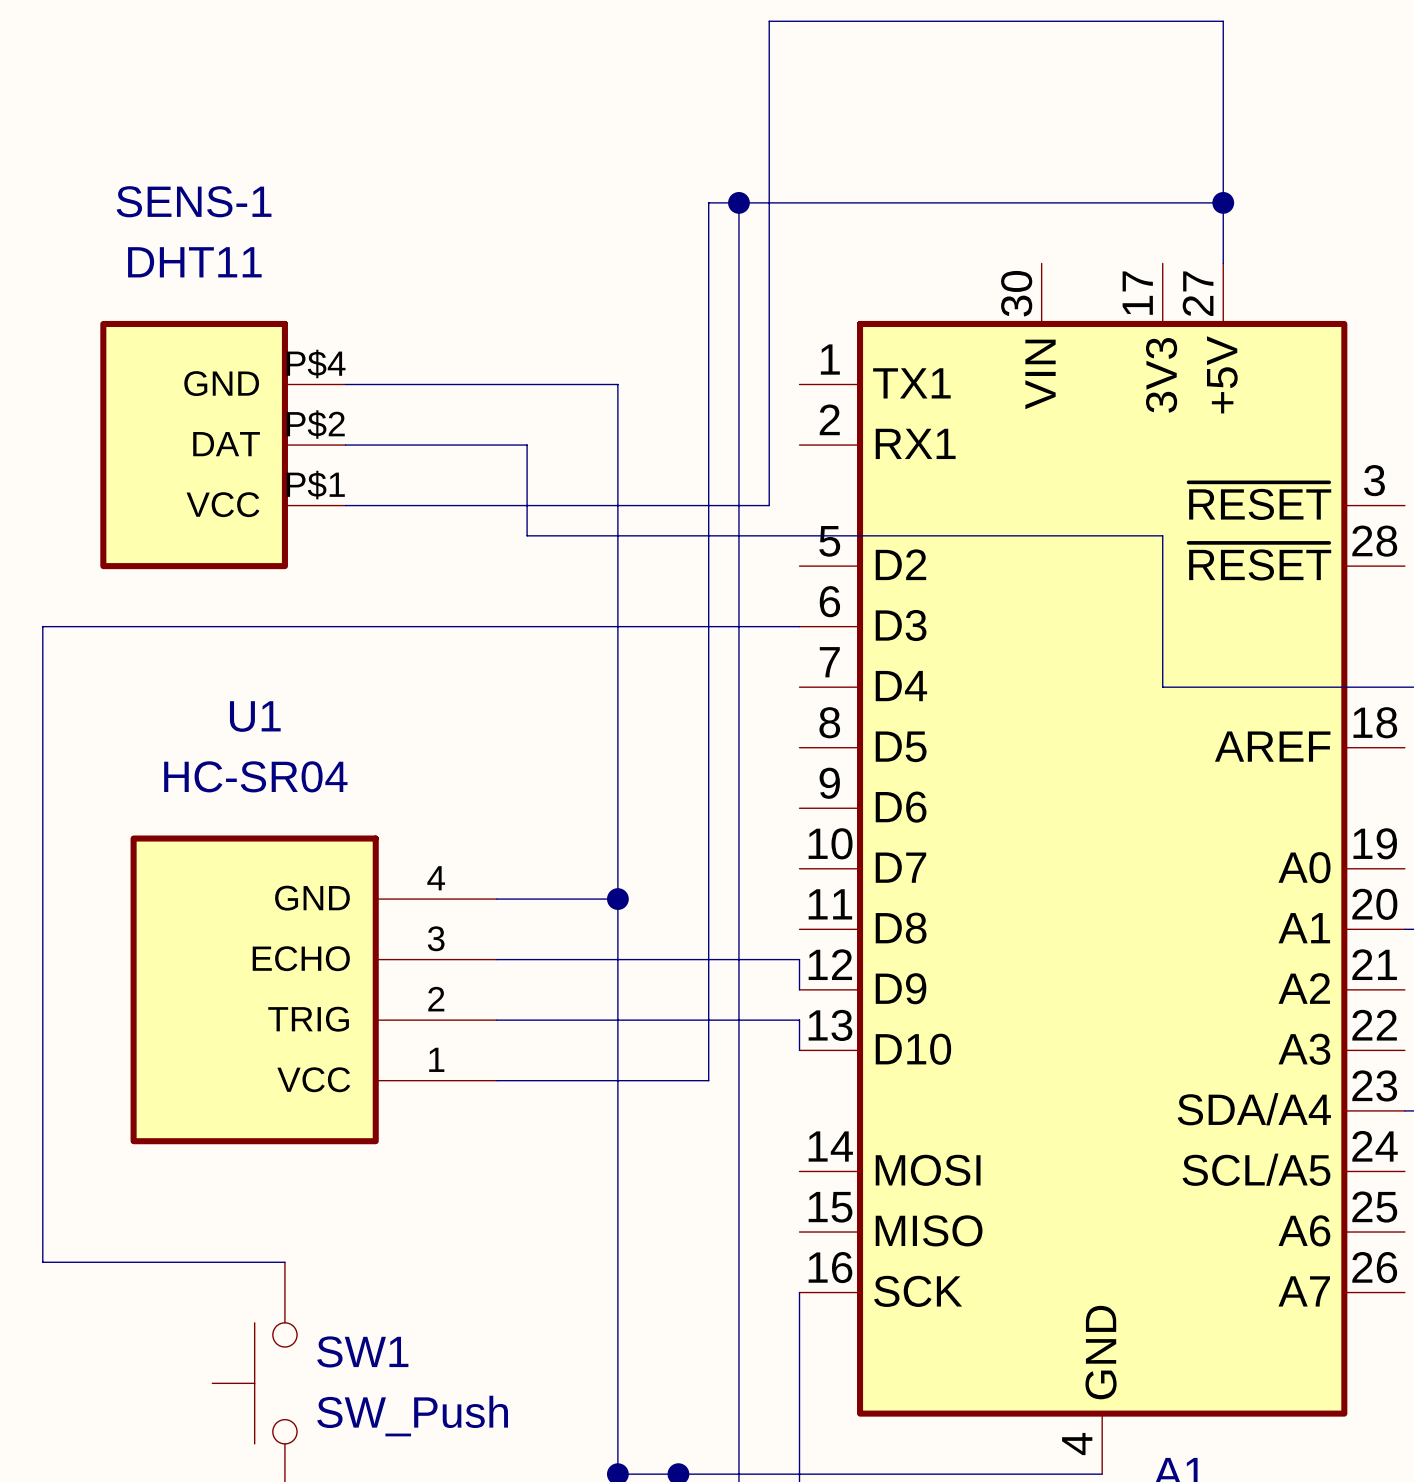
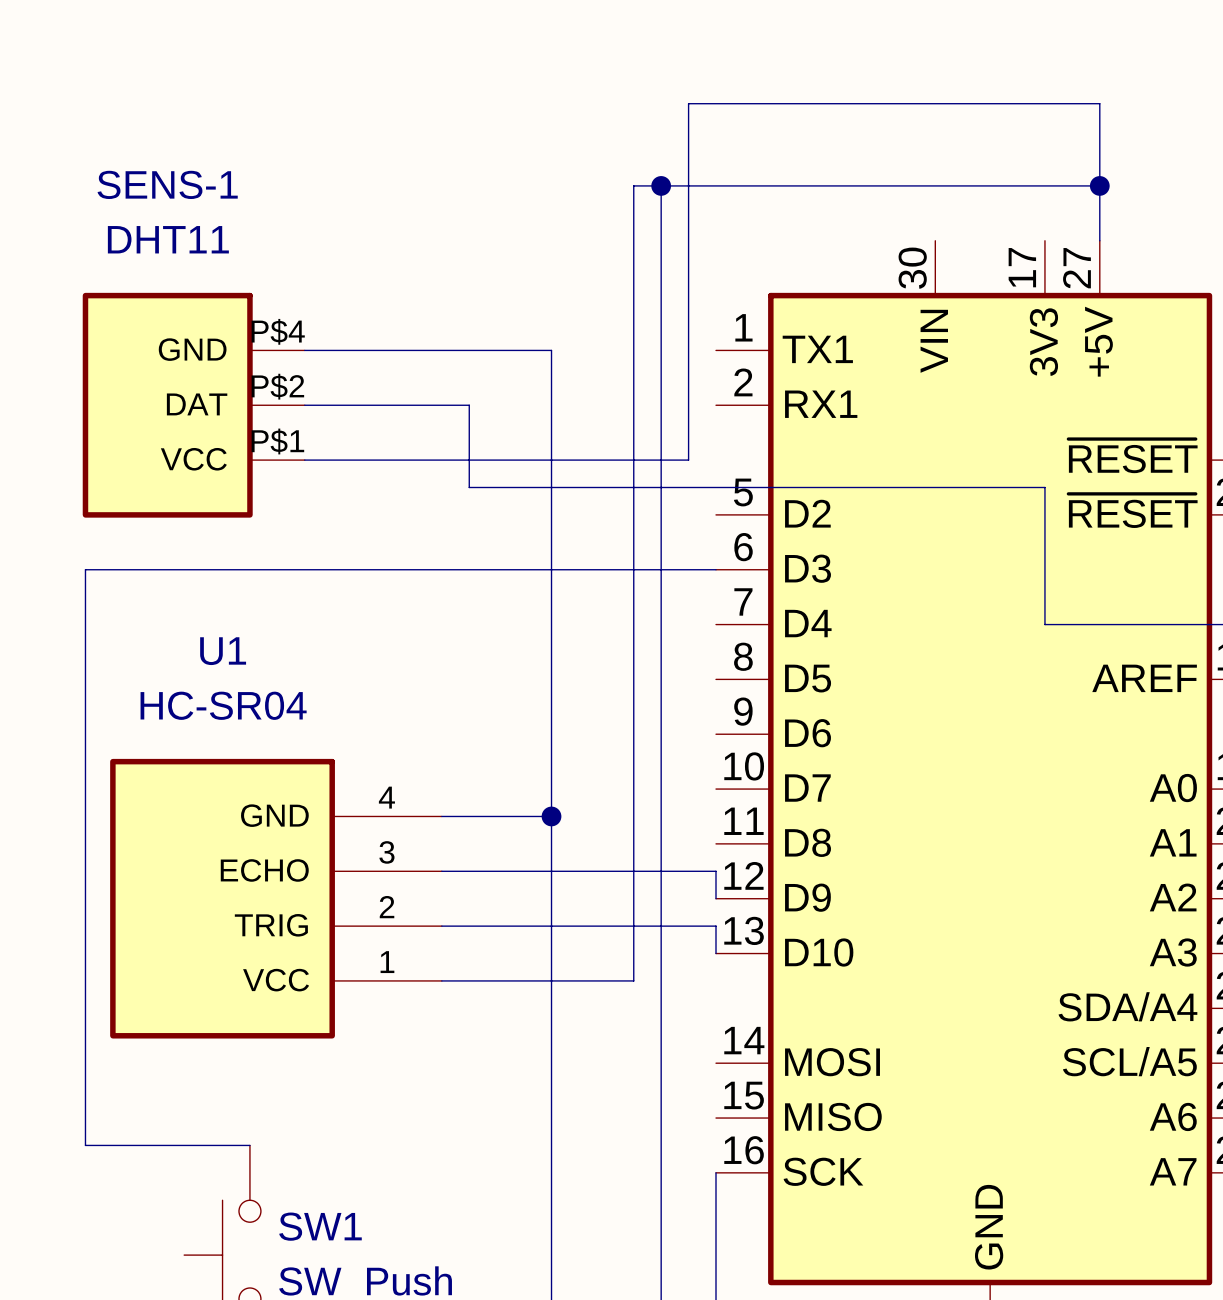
wire: (769, 112) (769, 21) (1223, 21) (1223, 112) -> (688, 103) (1099, 103)
wire: (103, 626) (42, 626) (42, 1262) (103, 1262) -> (85, 569) (85, 1145)

